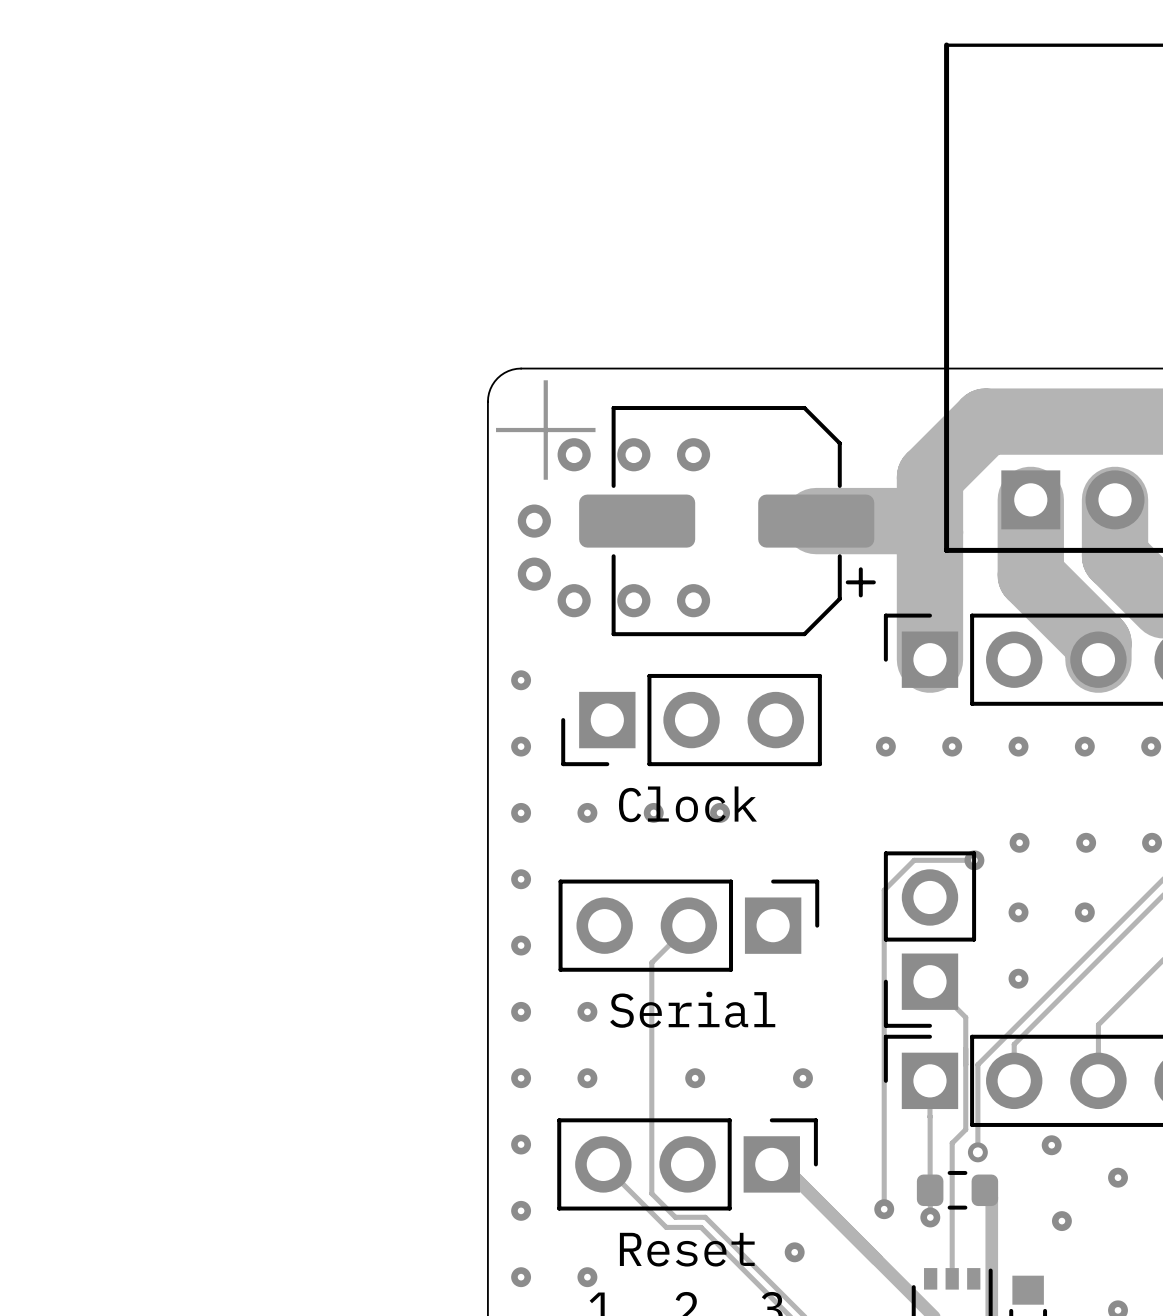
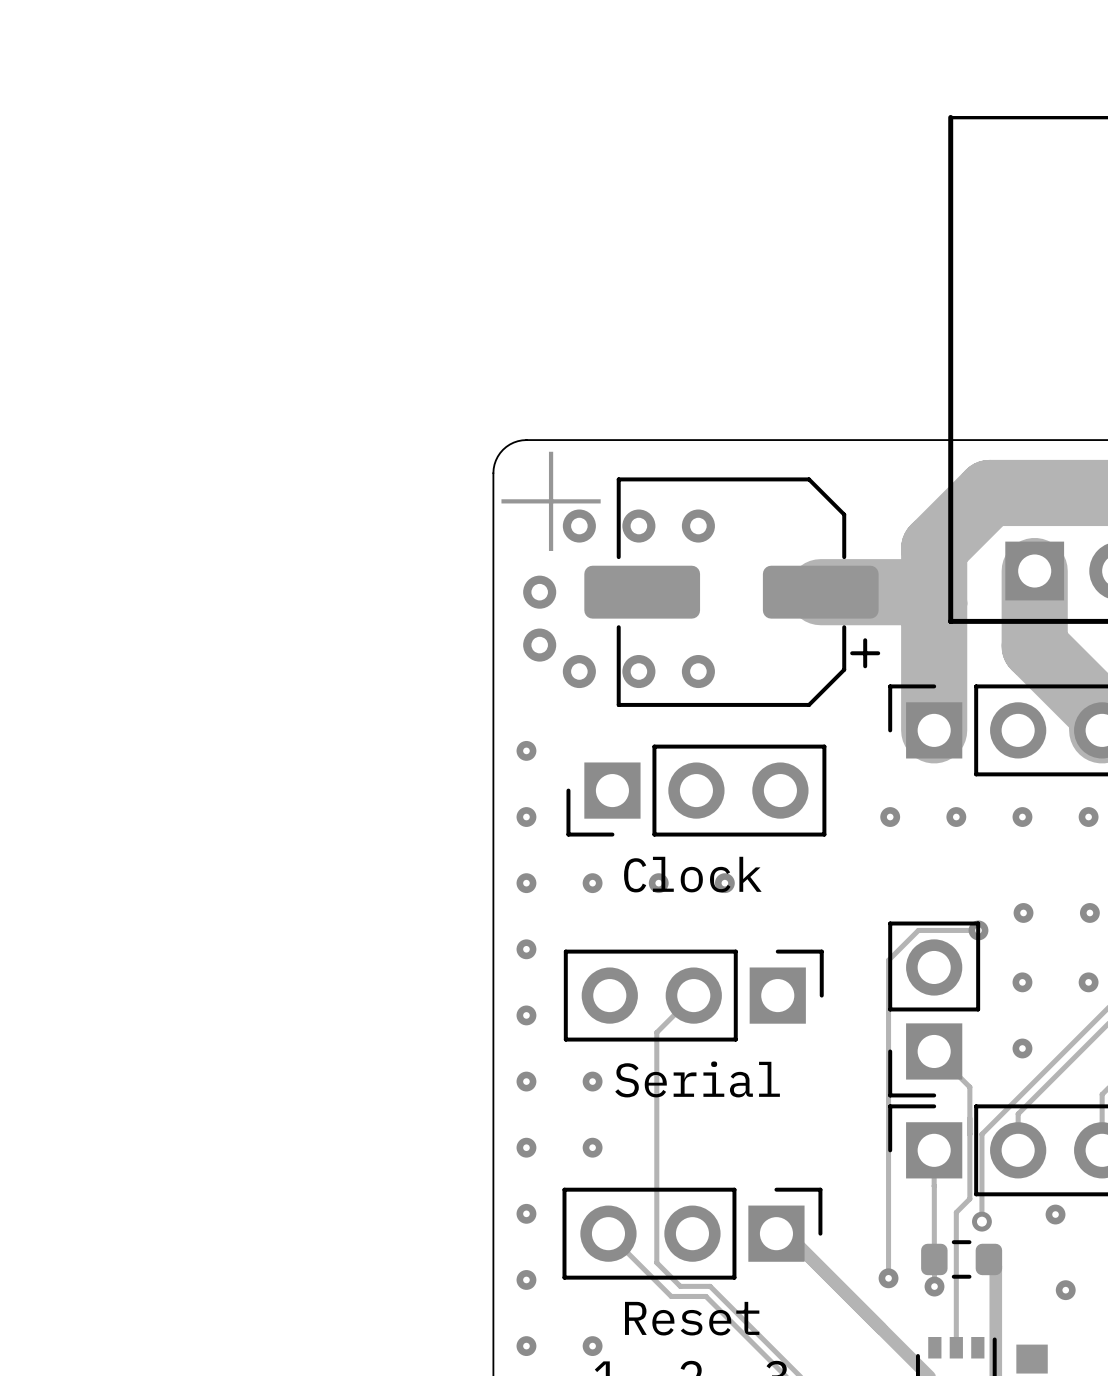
via: (695, 1078) -> none
via: (802, 1078) -> none
via: (794, 1252) -> none

